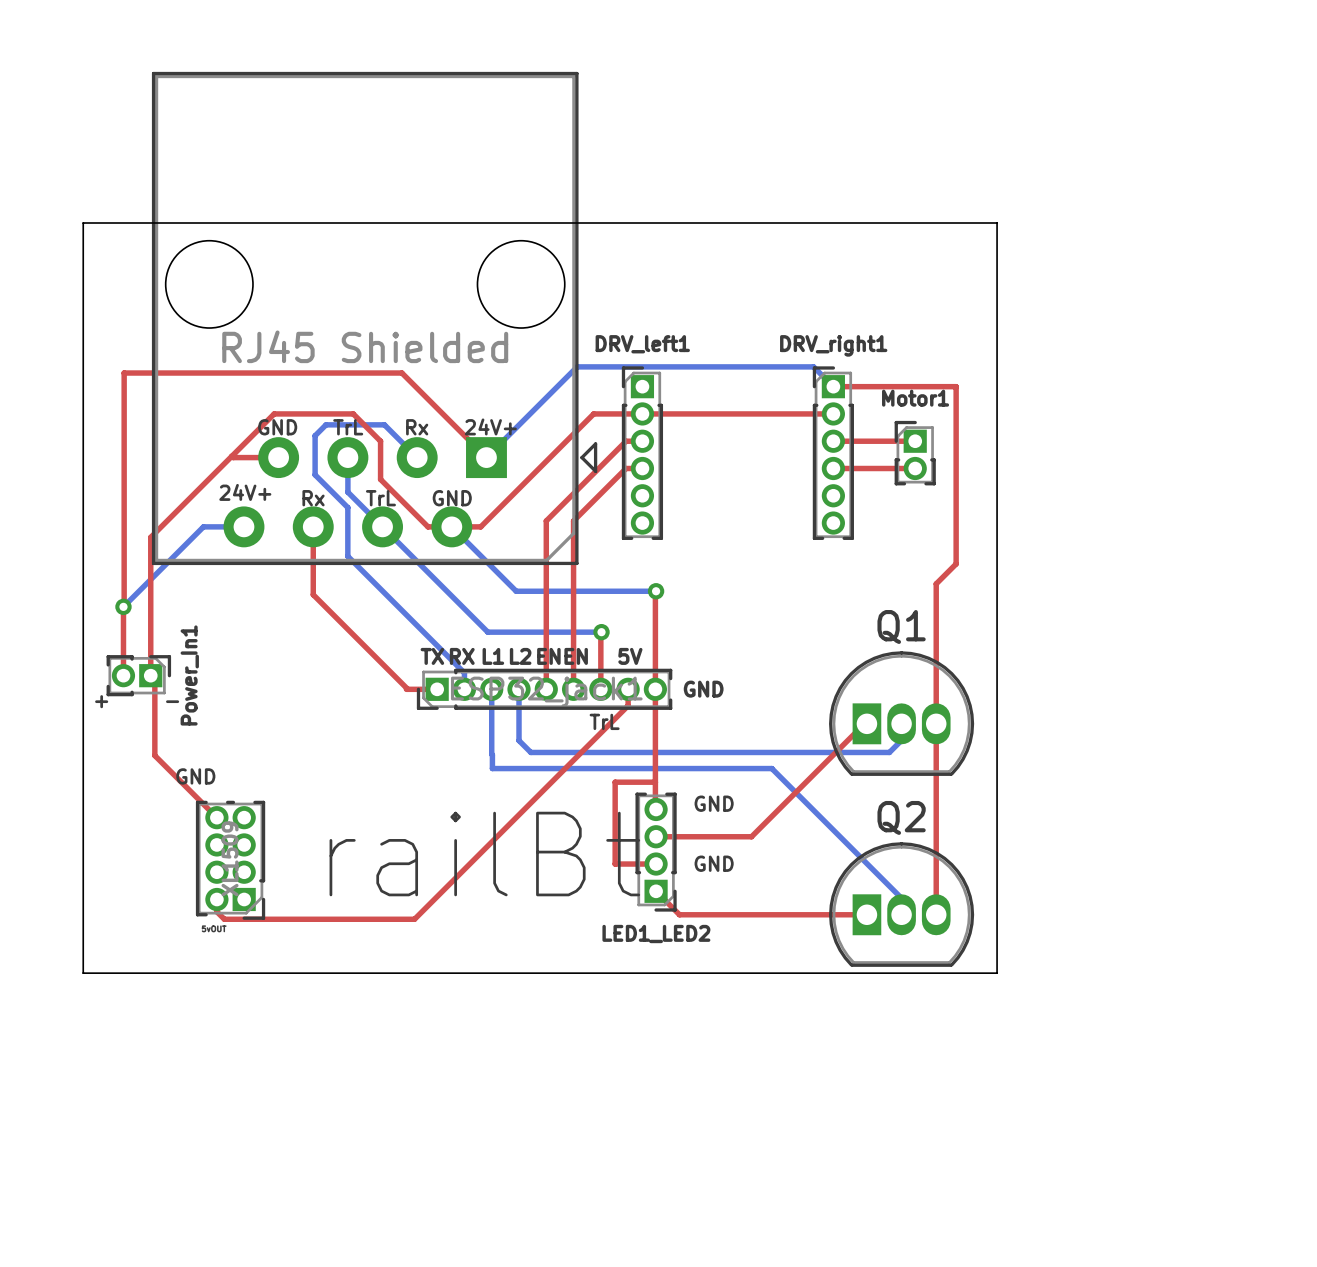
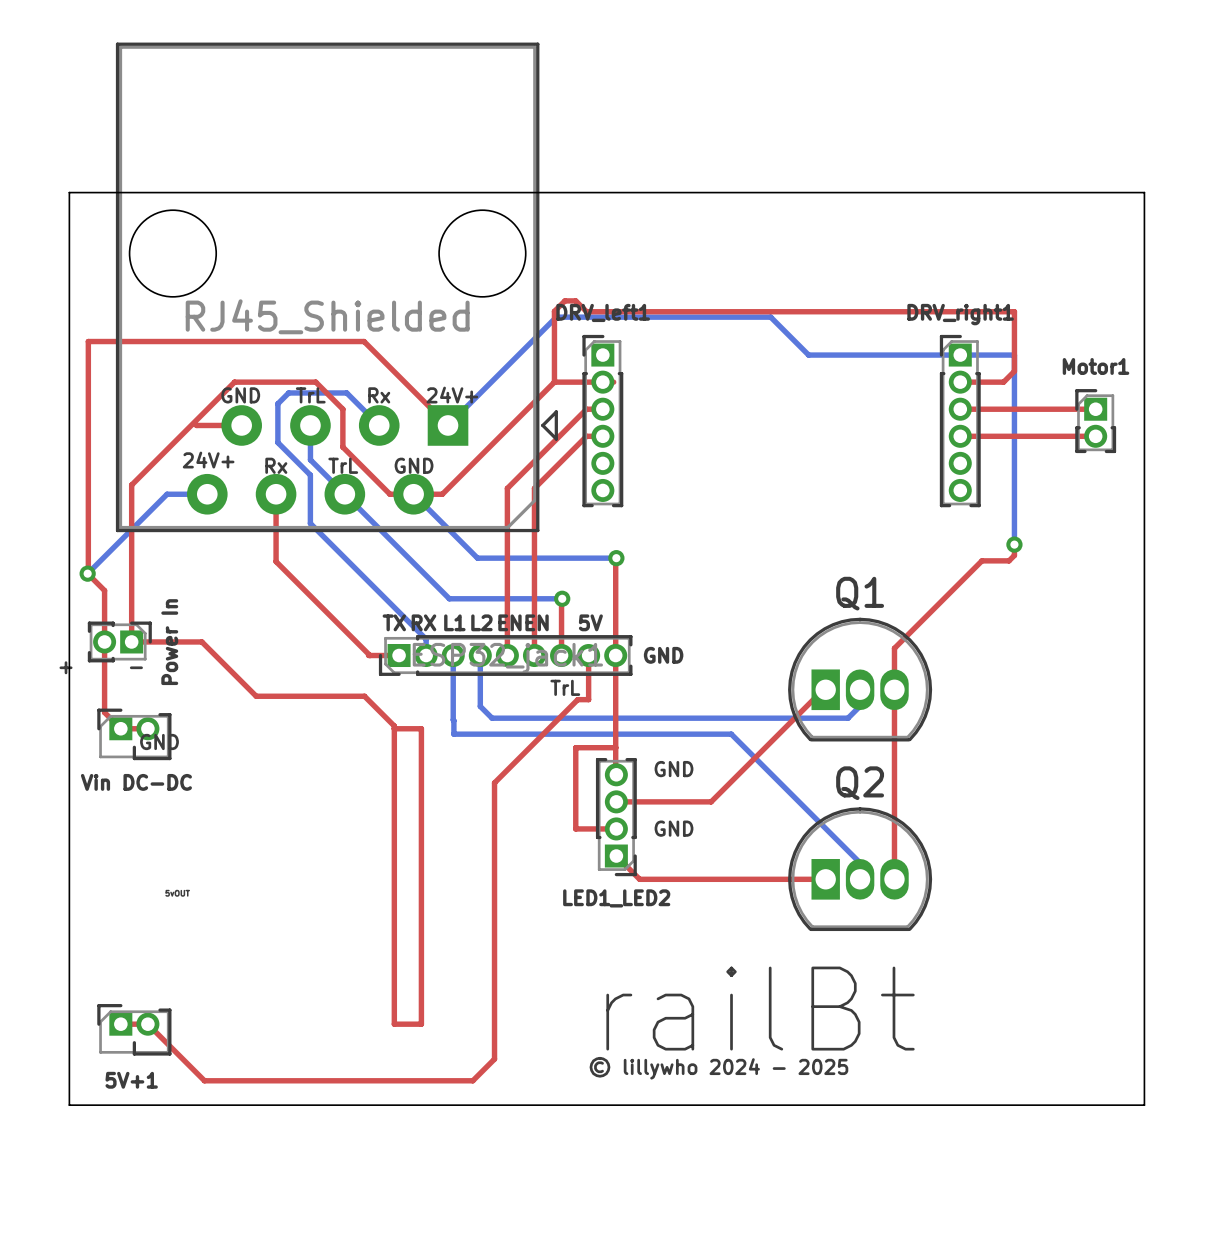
board edge: (105, 223) (83, 223) (83, 973) (997, 973) (997, 223) -> (69, 192) (69, 1105) (1144, 1105) (1144, 192) (954, 192)
part value: RJ45 Shielded (365, 346) -> RJ45_Shielded (327, 316)
bottom track: (577, 366) (813, 366) (833, 386) -> (538, 335) (556, 317) (770, 317) (808, 355) (1014, 355) (1014, 544)
top track: (833, 386) (956, 386) (956, 563) (936, 583) (936, 682) -> (1014, 544) (1014, 555) (1009, 560) (981, 560) (894, 648)
top track: (274, 413) (150, 537) (150, 675) (154, 679) (154, 755) (216, 817) -> (237, 382) (234, 382) (131, 485) (131, 641)
top track: none -> (554, 382) (554, 311) (564, 300) (575, 300) (586, 311) (1014, 311) (1014, 371) (1003, 382) (960, 382)
top track: (653, 413) (833, 413) -> none
top track: (833, 441) (915, 441) -> none
top track: none -> (960, 409) (1095, 409)
DRV_right1 position: (833, 453) -> (960, 421)
Motor1 position: (915, 453) -> (1095, 421)
top track: (833, 468) (915, 468) -> none
top track: none -> (960, 436) (1095, 436)
via: none -> (1014, 544)
top track: (123, 606) (123, 675) -> (87, 573) (104, 590) (104, 712) (120, 728) (147, 728)
Power_In1 position: (138, 675) -> (119, 641)
top track: none -> (131, 641) (201, 641) (256, 696) (364, 696) (394, 726) (394, 1024) (421, 1024) (421, 728) (394, 728)
Power_In1 name: Power_In1 (189, 675) -> Power In (169, 642)
top track: (628, 705) (414, 919) (224, 919) (216, 911) (216, 899) -> (588, 671) (588, 699) (577, 699) (494, 782) (494, 1059) (472, 1080) (204, 1080) (147, 1024) (120, 1024)
Vin DC-DC: none -> (134, 734)
text position: railBt (484, 854) -> railBt (760, 1008)
part: (230, 860) -> none
5V+1: none -> (134, 1029)
text: none -> © lillywho 2024 - 2025 (718, 1068)

